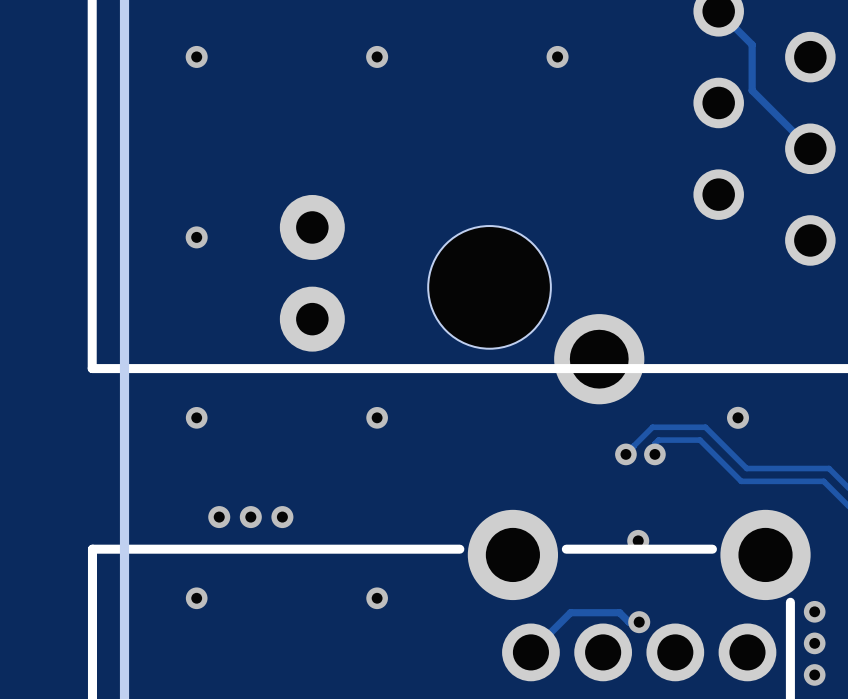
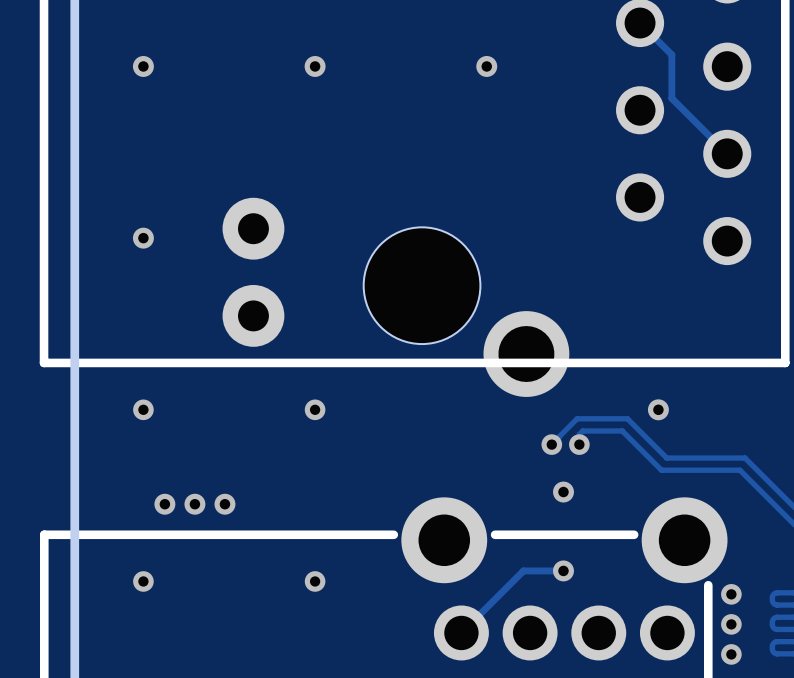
via: none -> (563, 492)
via: (638, 540) -> none
via: none -> (563, 570)
track: (570, 612) (619, 612) (629, 622) (639, 622) -> (499, 595) (523, 570) (563, 570)
via: (639, 622) -> none

